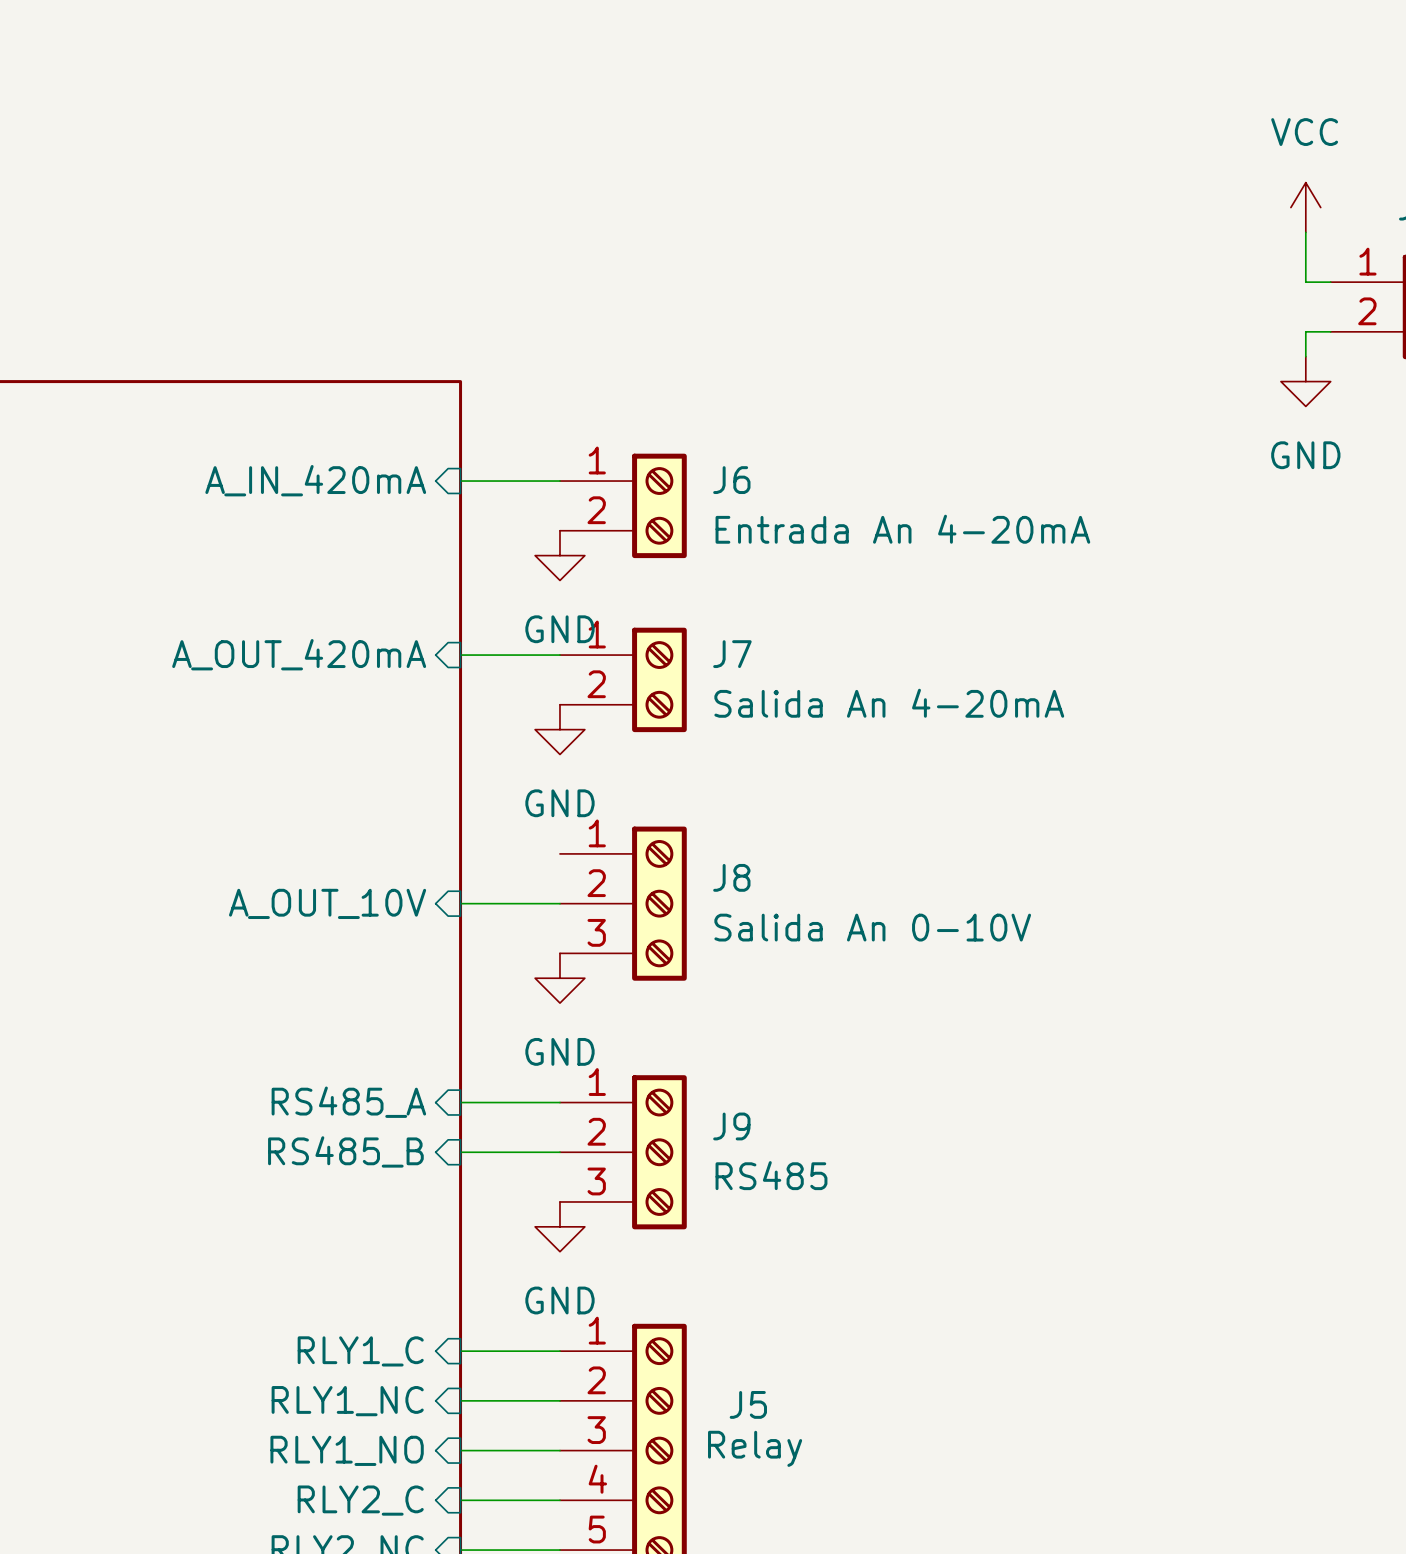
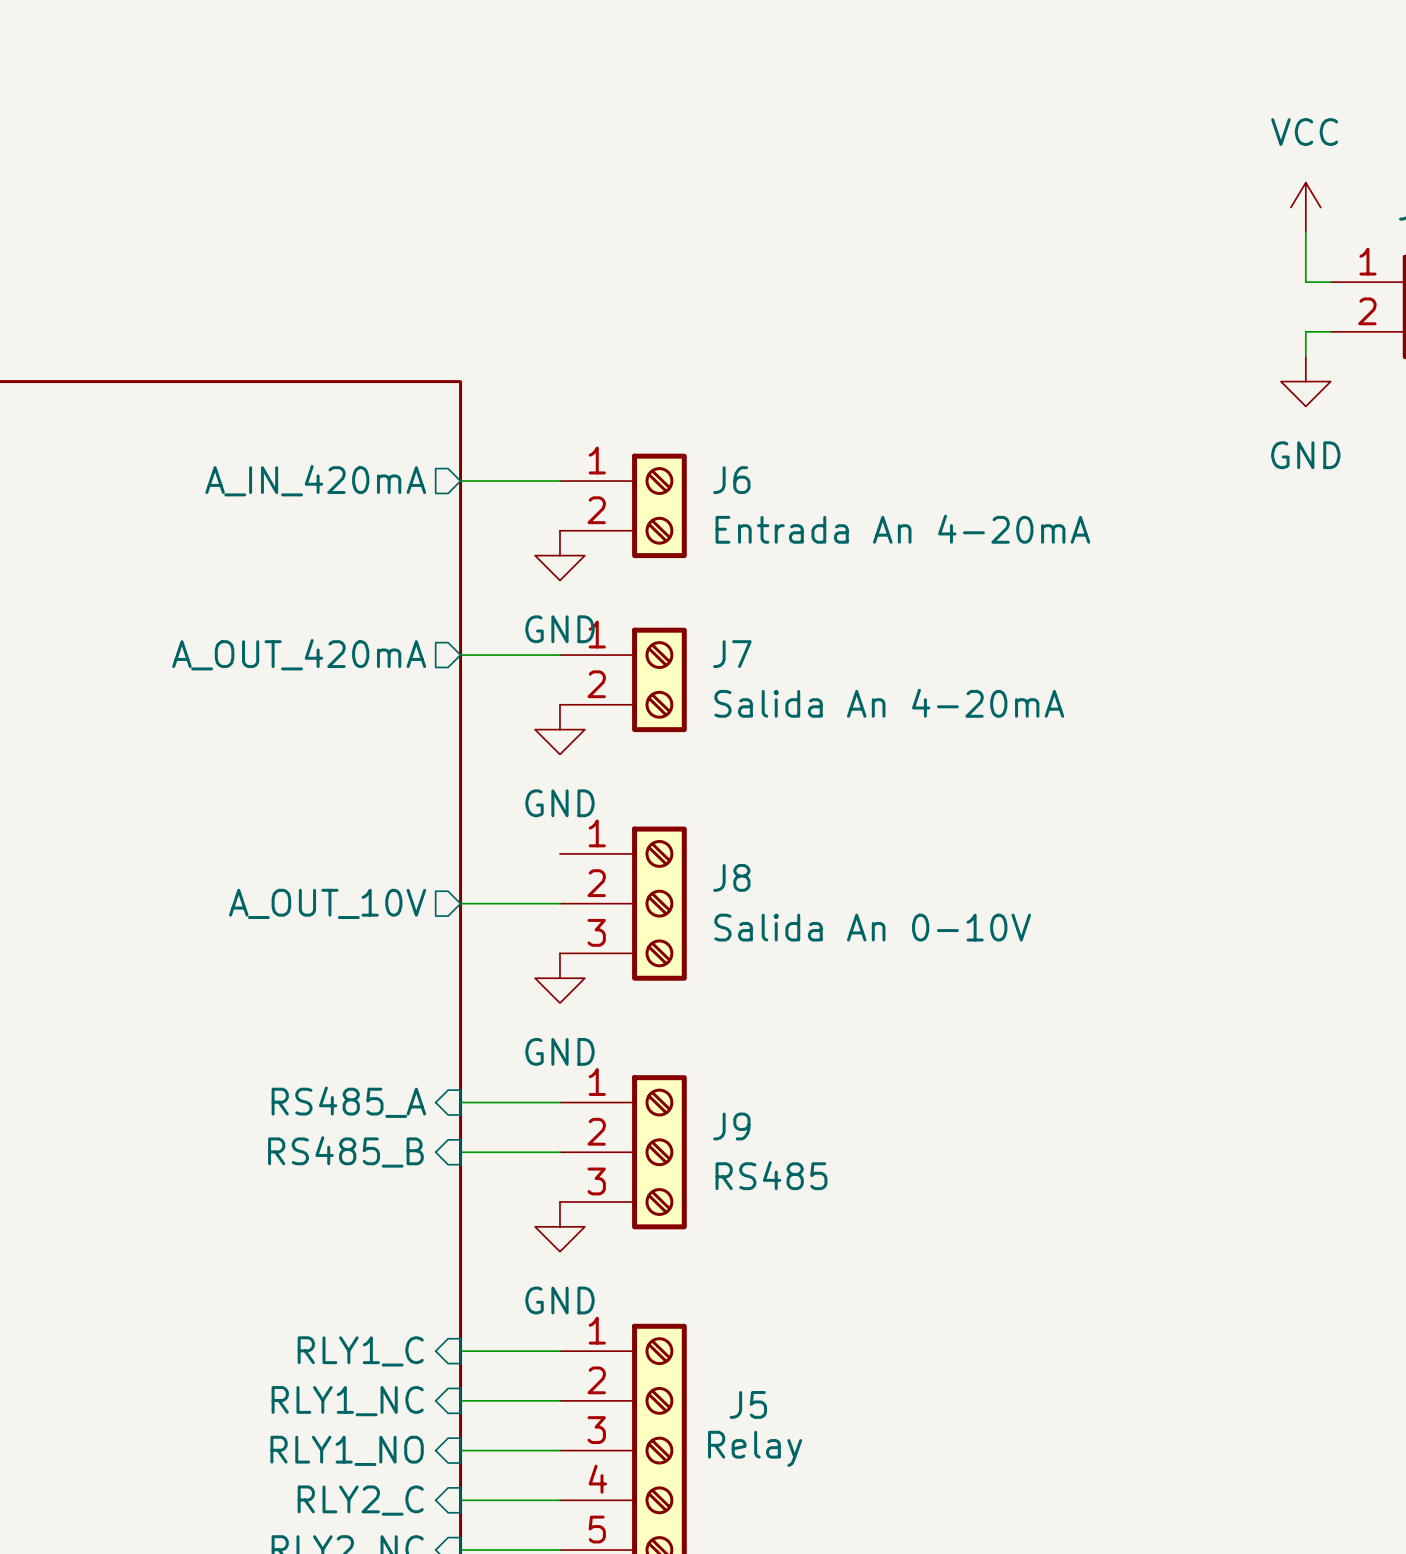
sheet pin shape: input (315, 480) -> output (315, 480)
sheet pin shape: input (299, 654) -> output (299, 654)
sheet pin shape: input (327, 903) -> output (327, 903)

